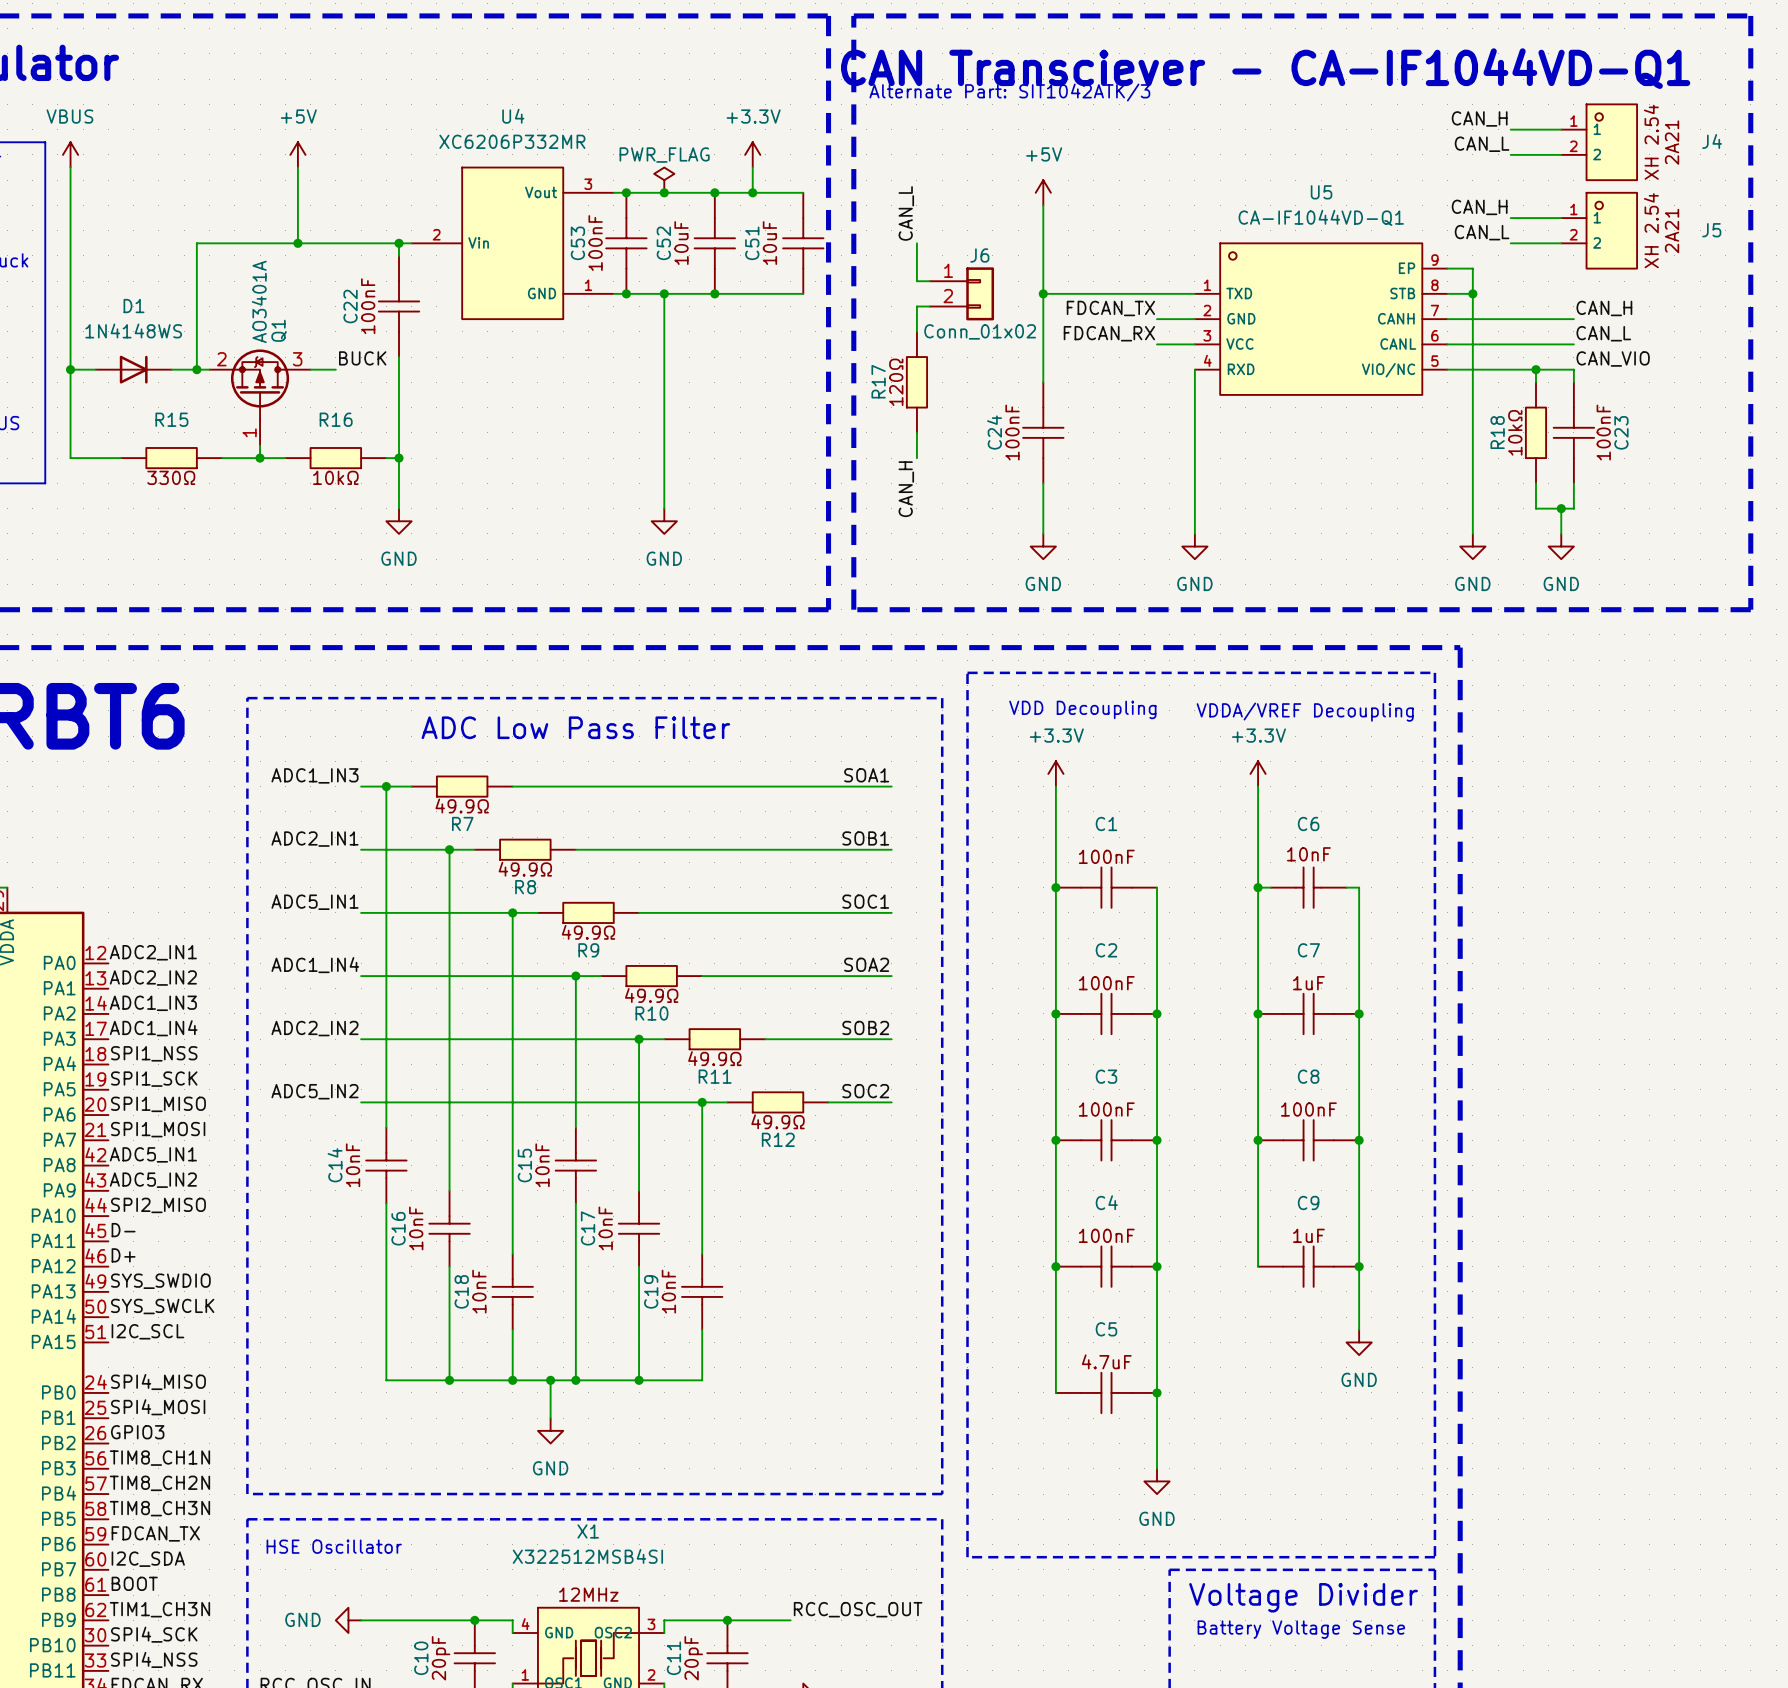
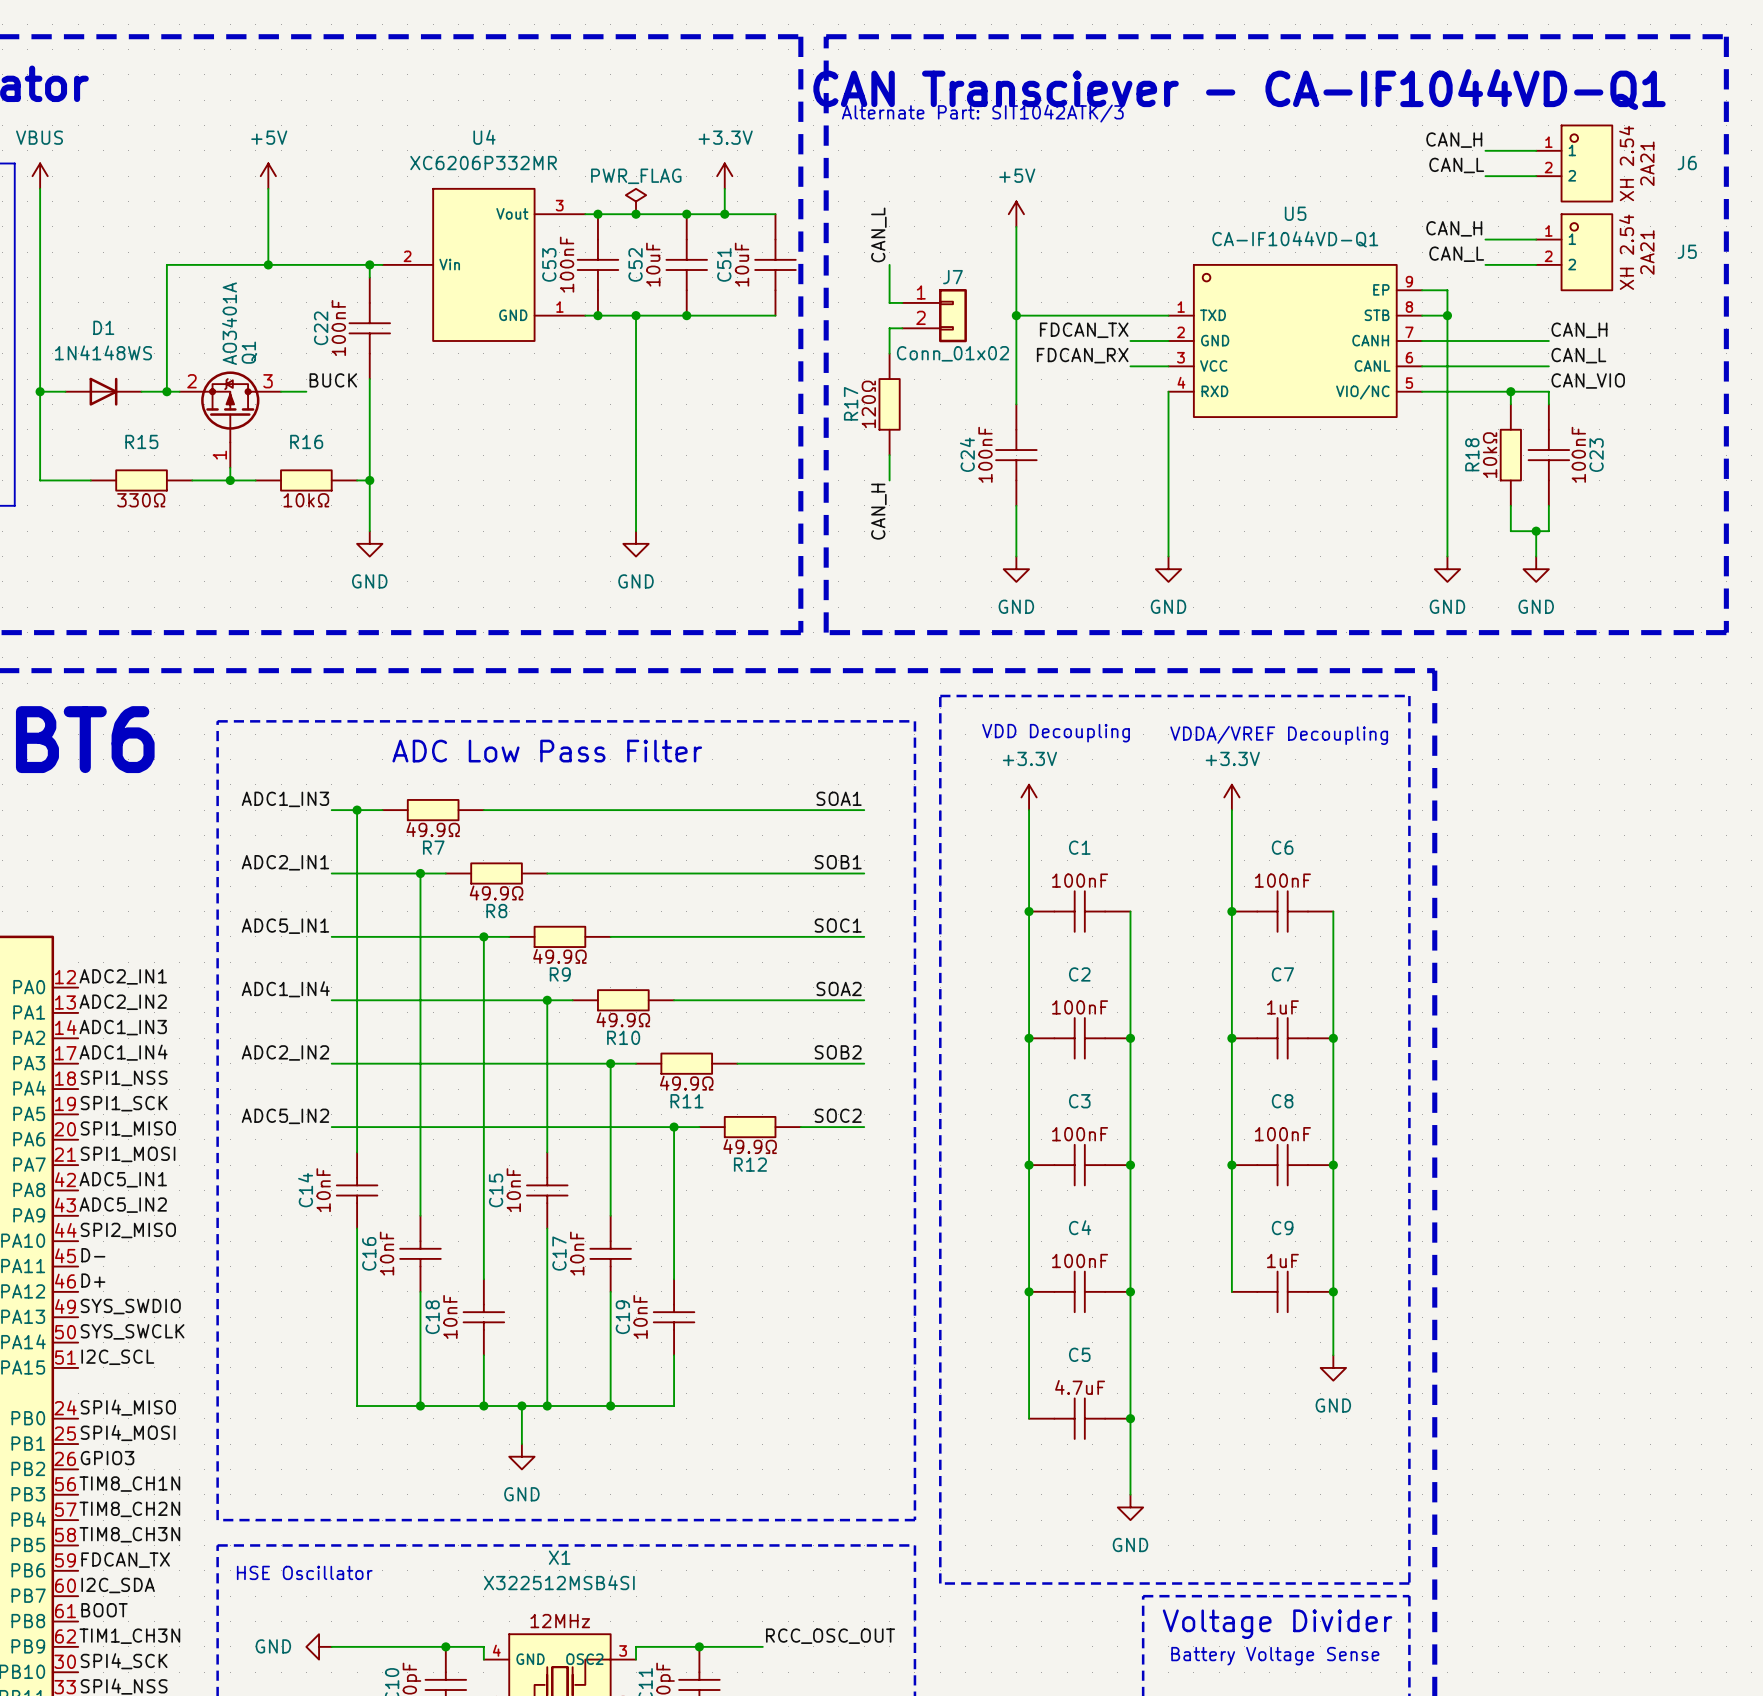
J4 name: J4 (1712, 141) -> J6 (1687, 163)
J6 name: J6 (979, 255) -> J7 (952, 277)
C6 symbol: [1270, 867, 1347, 908] -> [1231, 891, 1334, 932]

